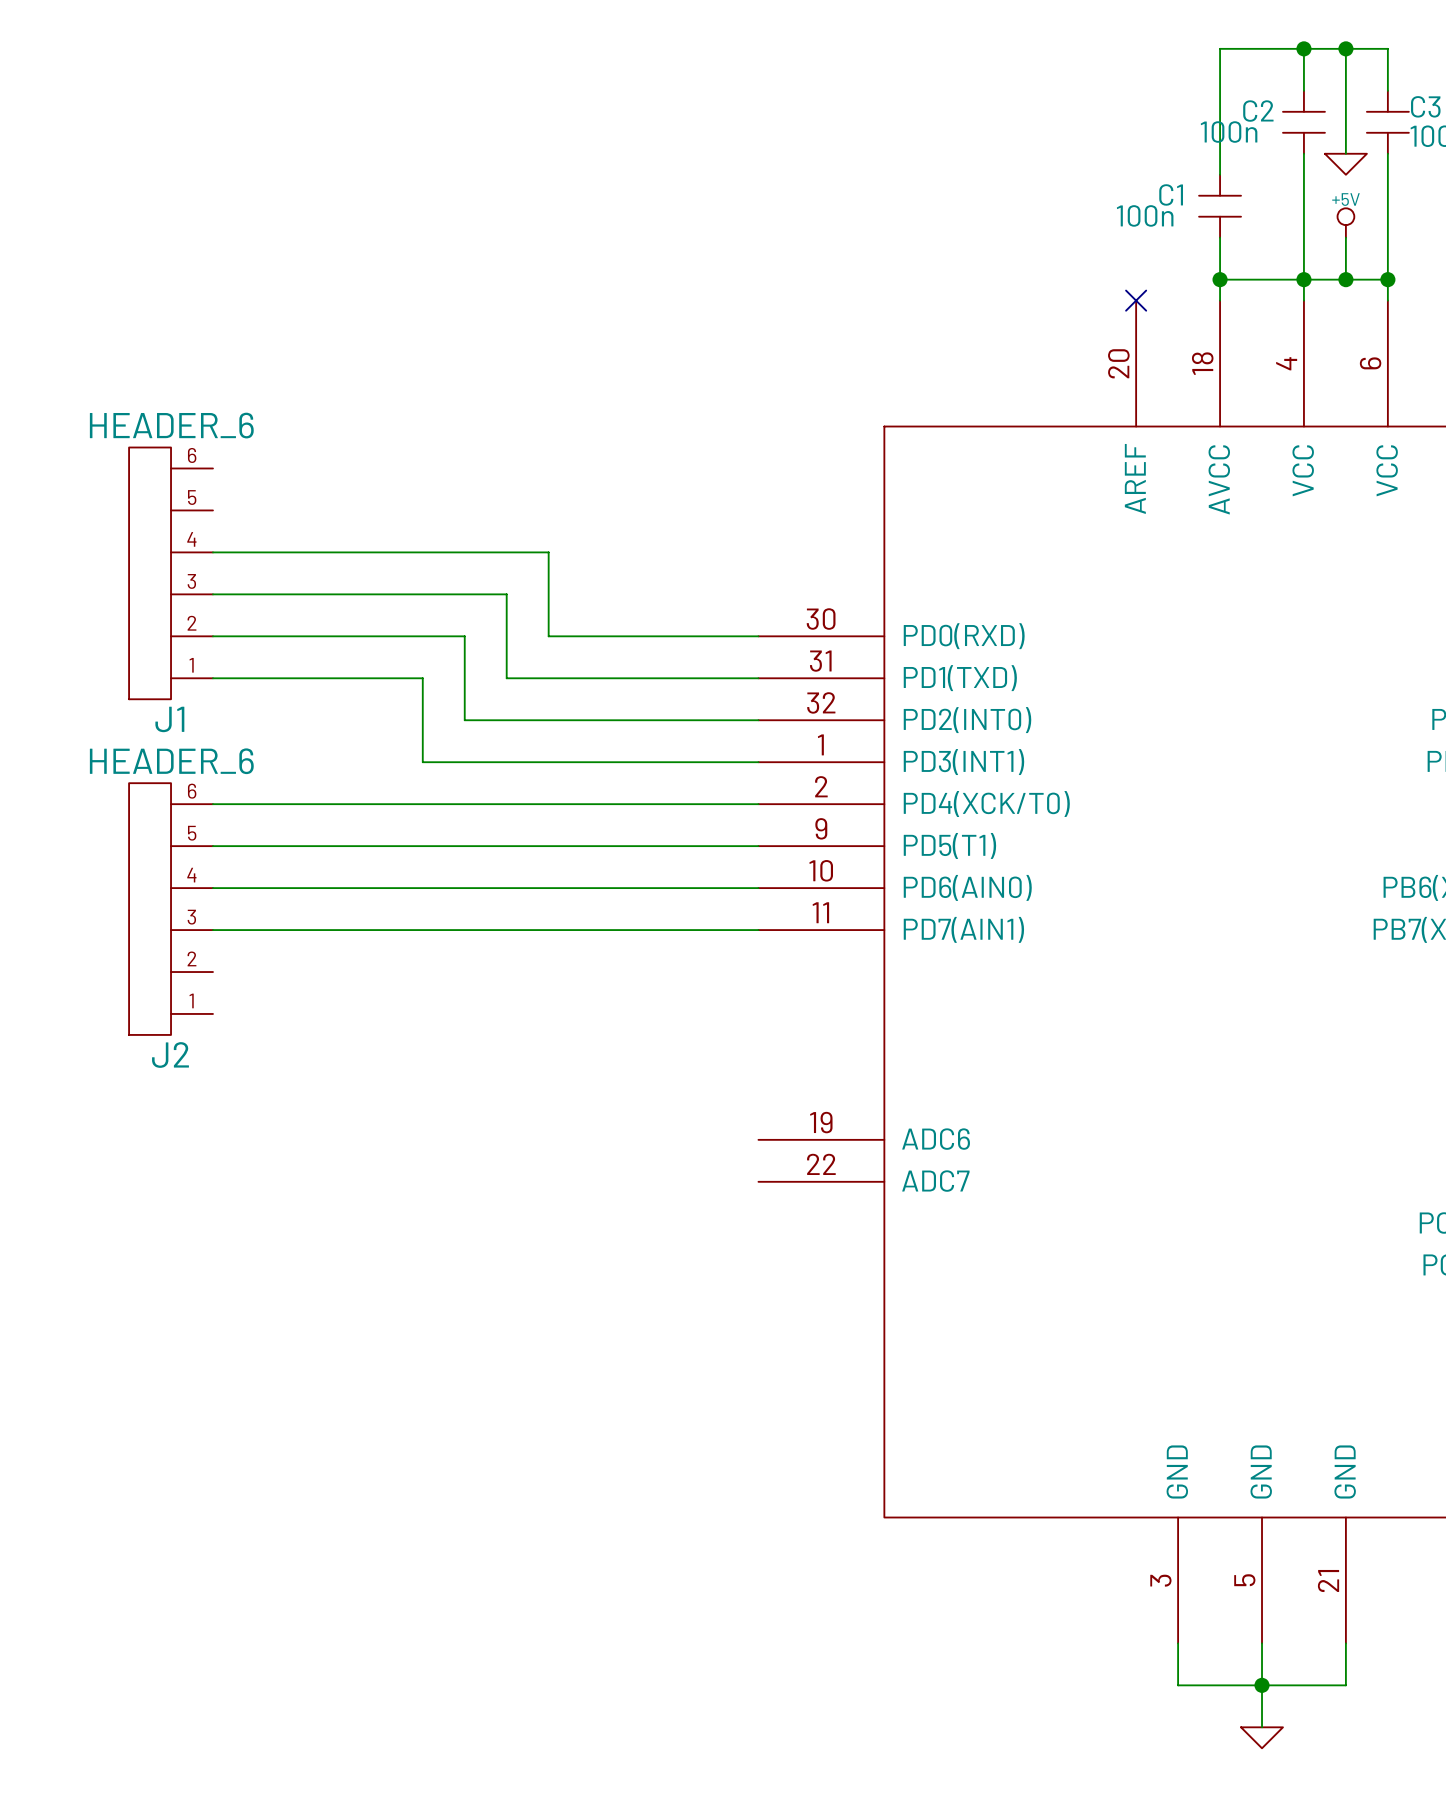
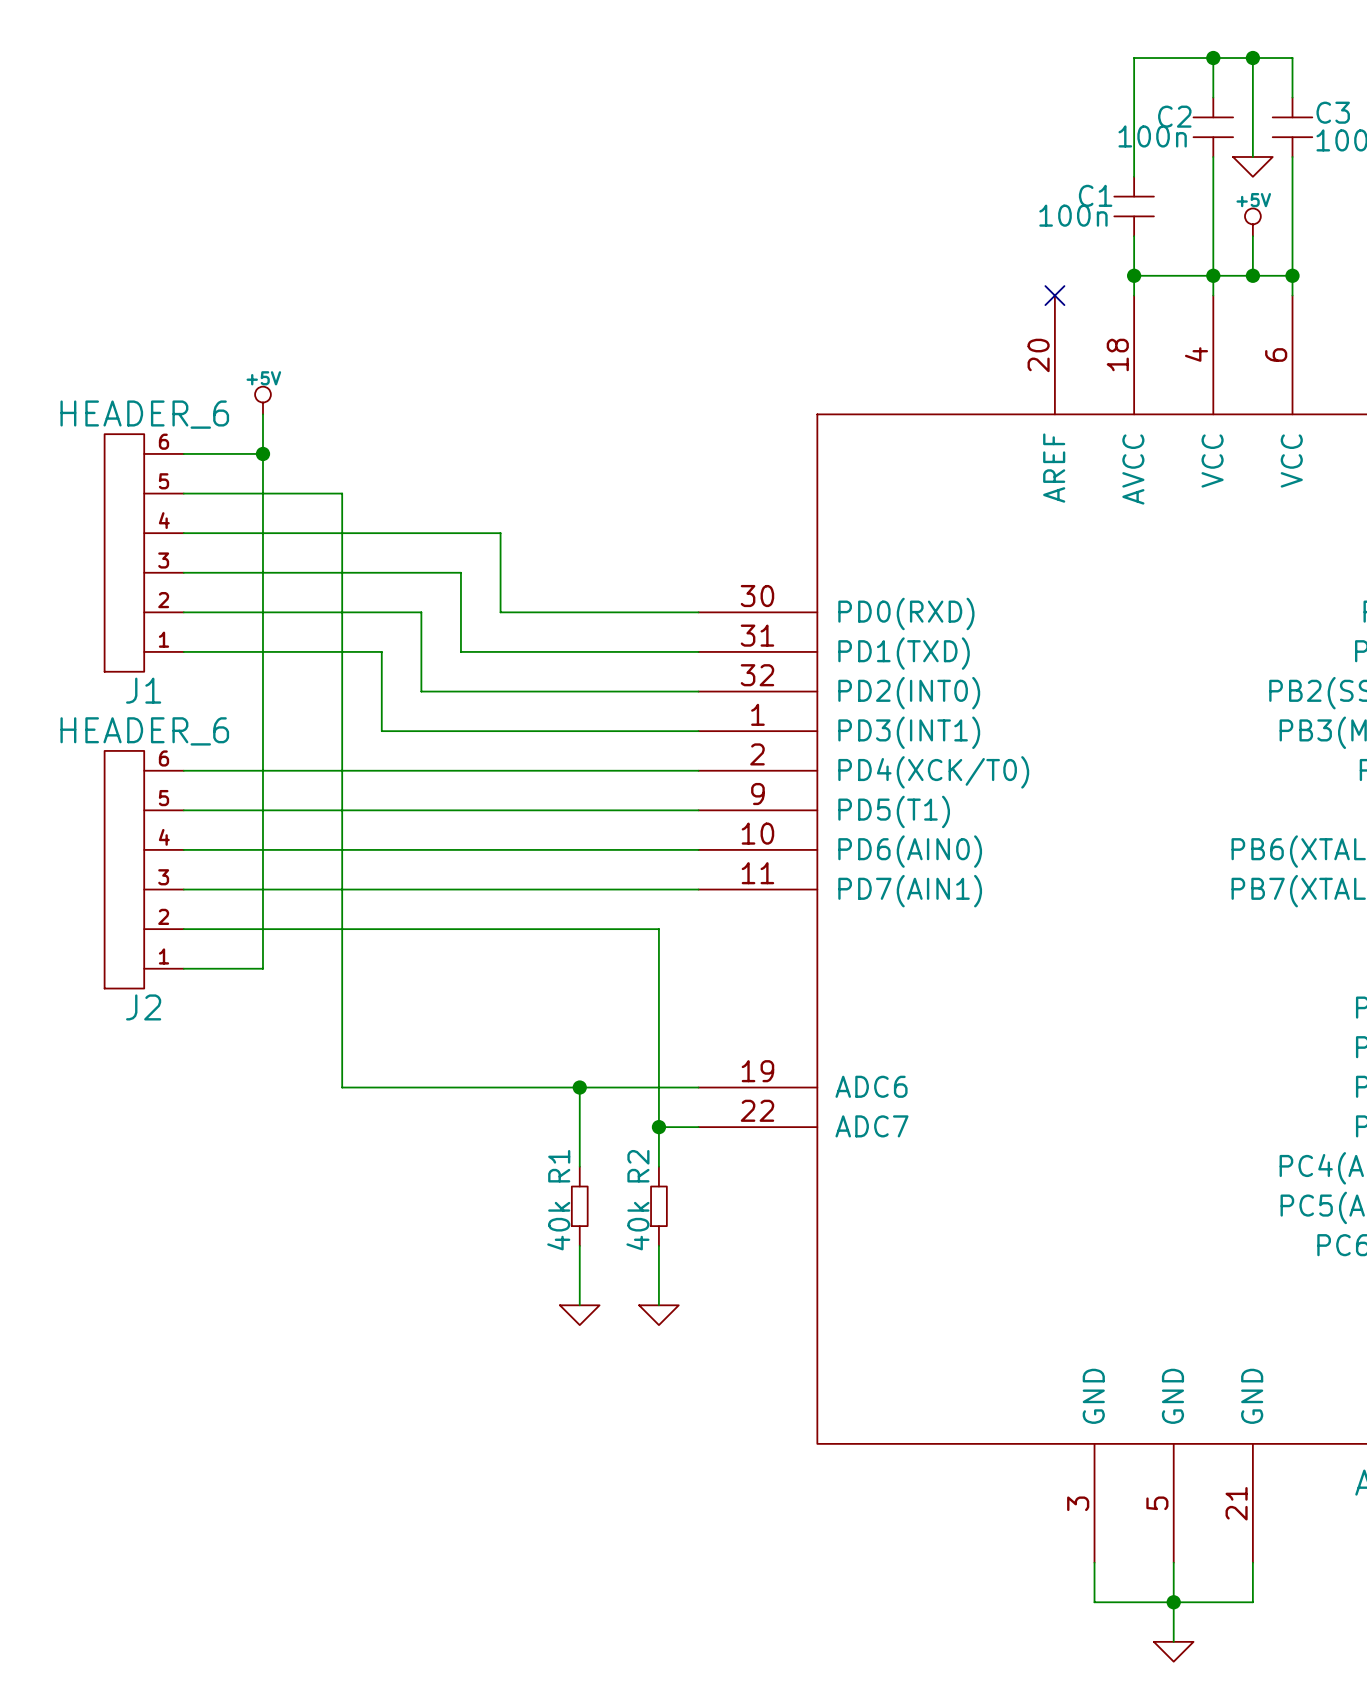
power symbol: none -> +5V (262, 400)
wire: none -> (262, 414) (262, 968) (183, 968)
wire: none -> (183, 453) (262, 453)
junction: none -> (262, 453)
wire: none -> (183, 493) (342, 493) (342, 1087) (698, 1087)
wire: none -> (183, 929) (658, 929) (658, 1166)
wire: none -> (579, 1087) (579, 1166)
junction: none -> (579, 1087)
wire: none -> (658, 1127) (698, 1127)
junction: none -> (658, 1127)
R1: none -> 40k (579, 1206)
R2: none -> 40k (658, 1206)
wire: none -> (579, 1245) (579, 1305)
wire: none -> (658, 1245) (658, 1305)
power symbol: none -> (579, 1315)
power symbol: none -> (658, 1315)

